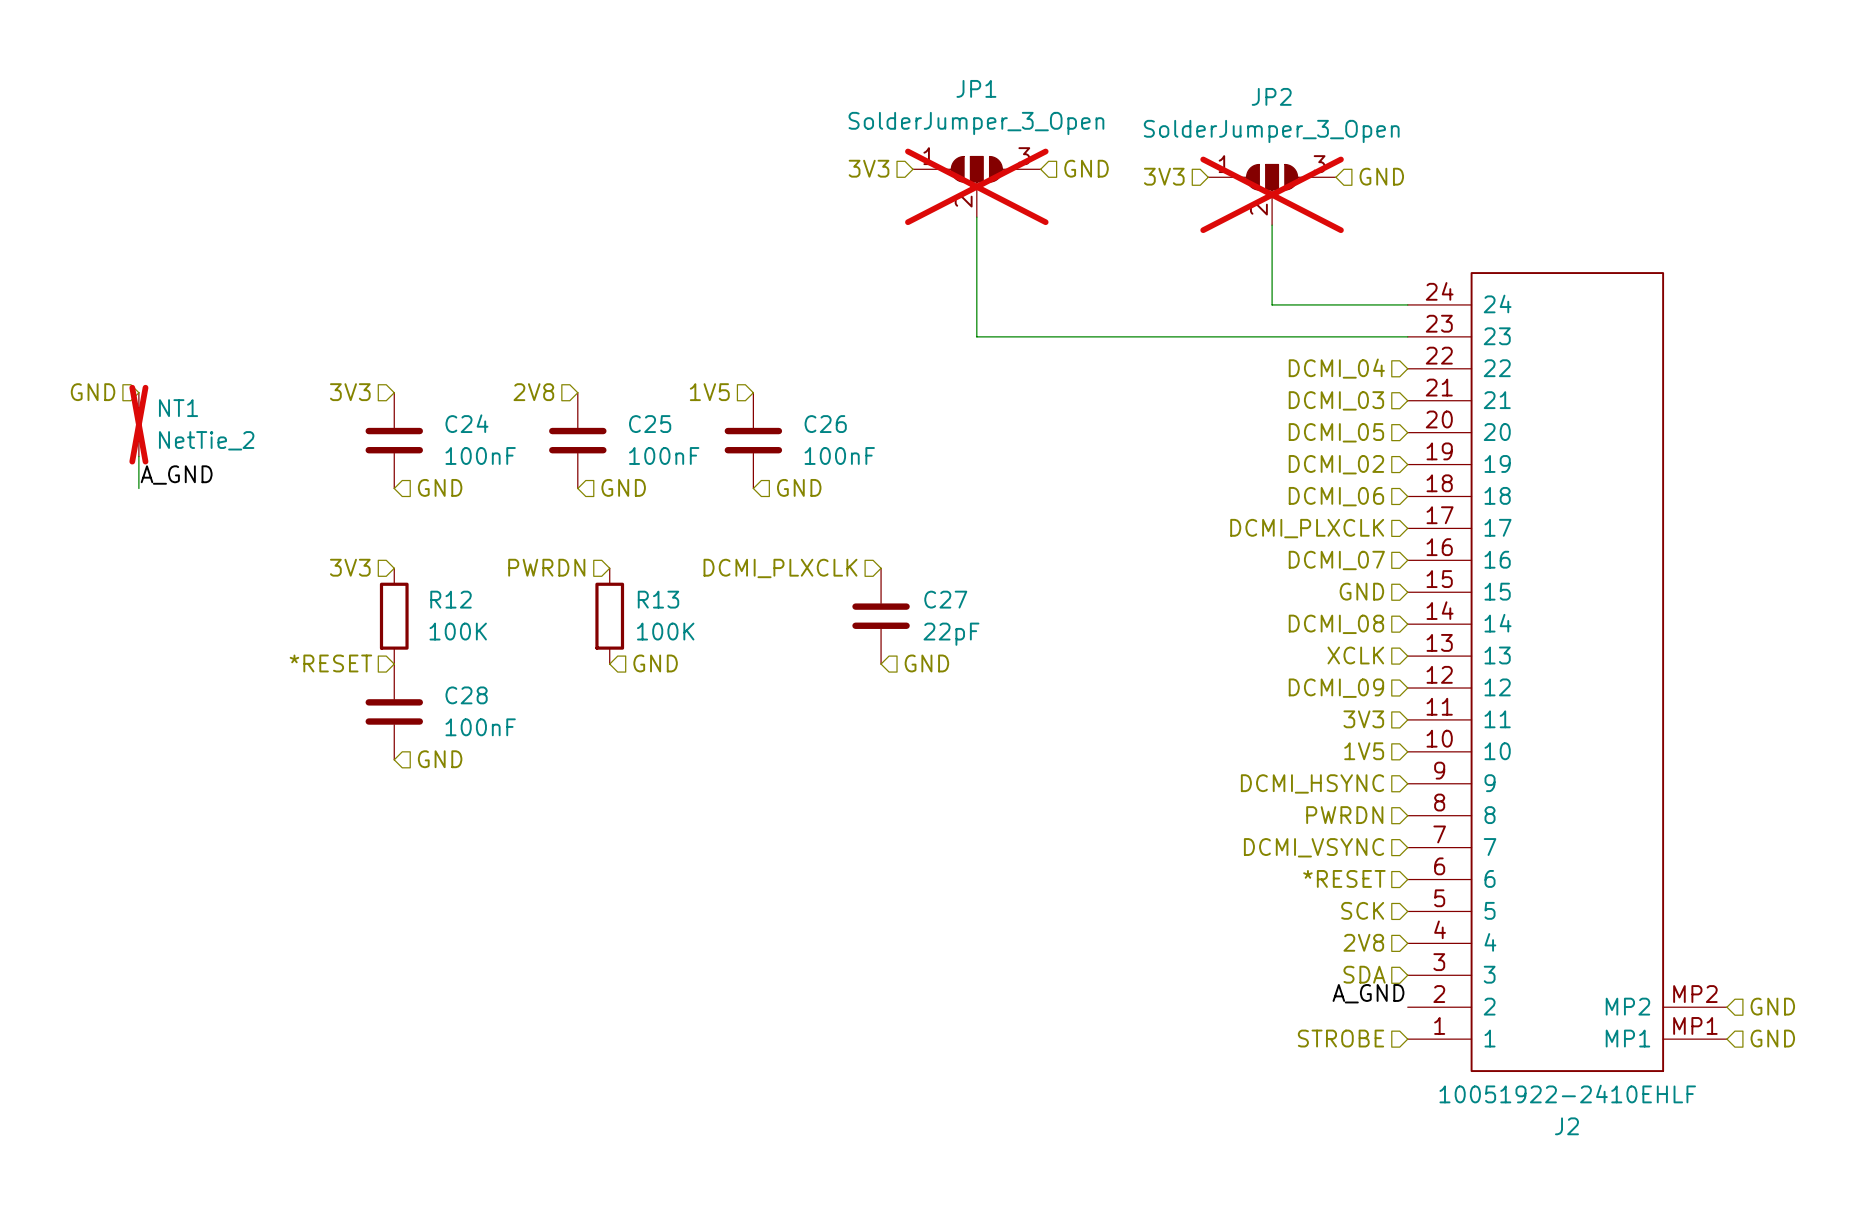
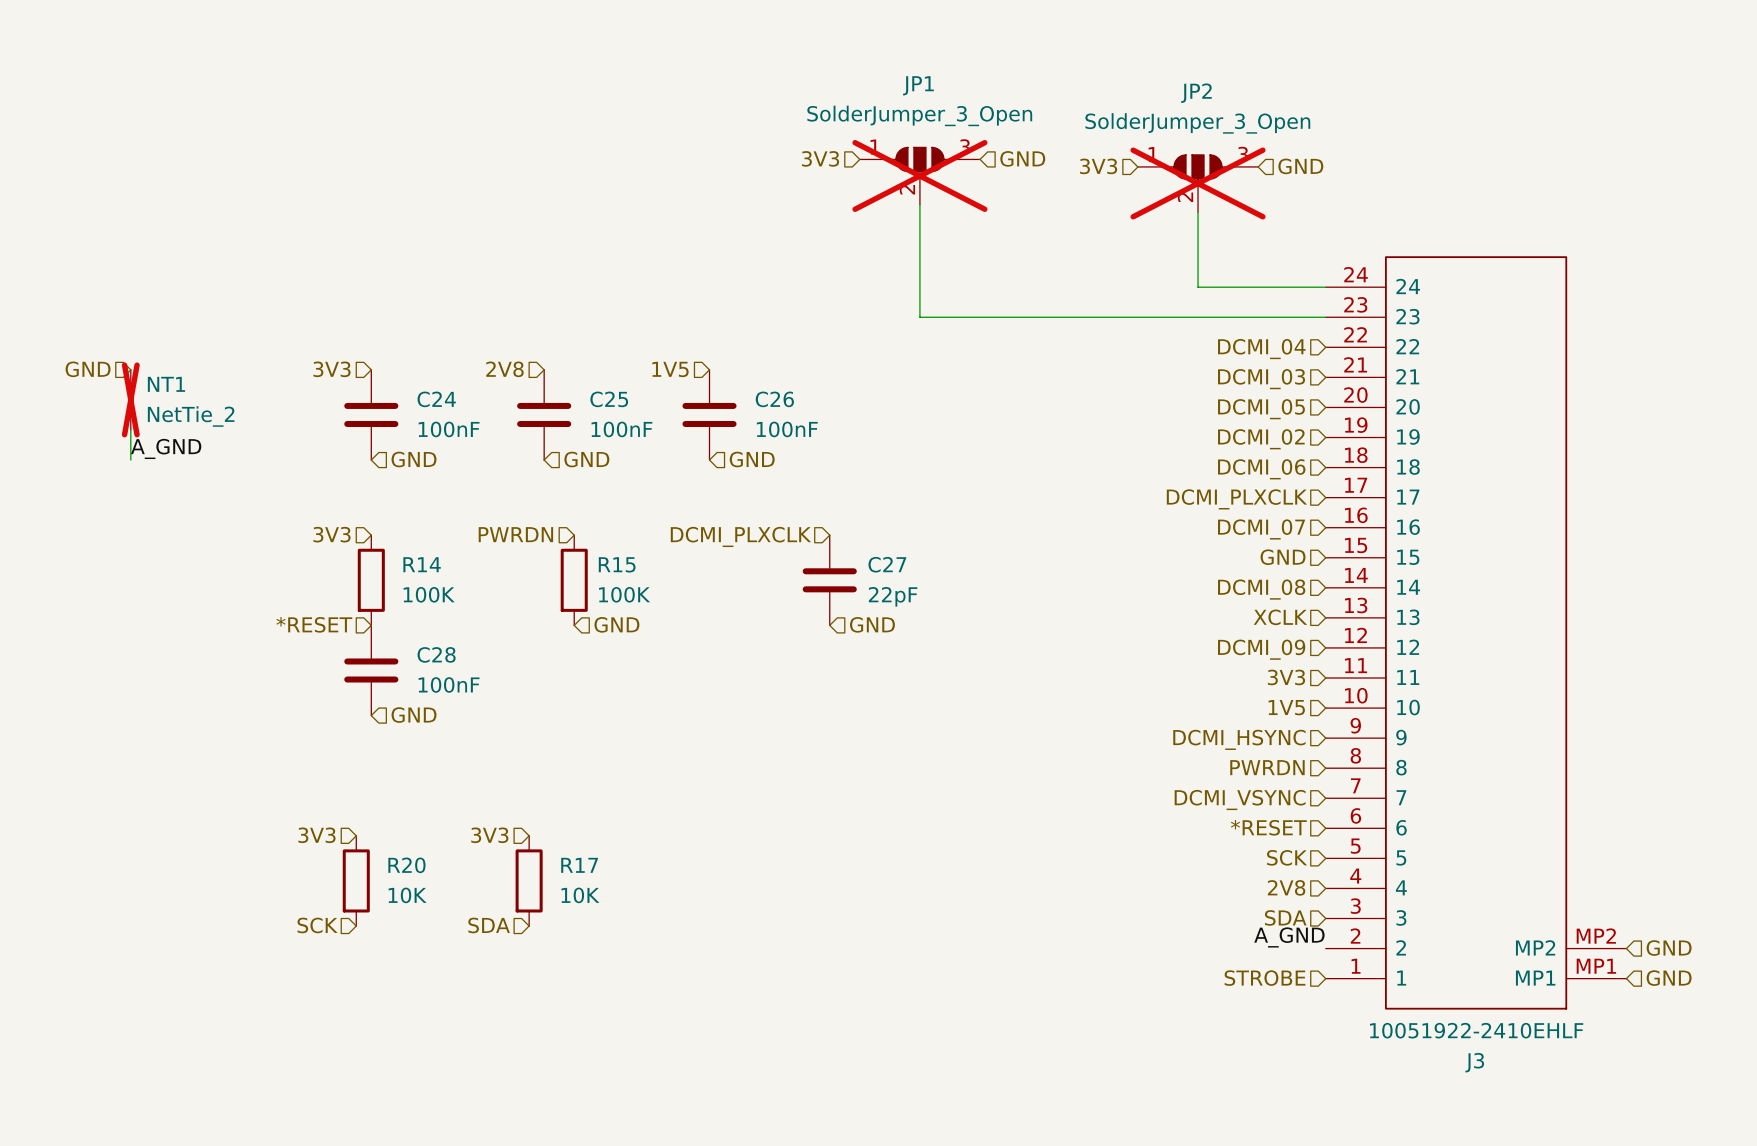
R12 name: R12 (451, 599) -> R14 (422, 564)
R13 name: R13 (658, 599) -> R15 (617, 564)
hierarchical label: none -> 3V3 (316, 835)
hierarchical label: none -> 3V3 (489, 835)
R20: none -> 10K (356, 880)
R17: none -> 10K (529, 880)
hierarchical label: none -> SCK (317, 925)
hierarchical label: none -> SDA (489, 925)
J2 name: J2 (1566, 1126) -> J3 (1474, 1062)

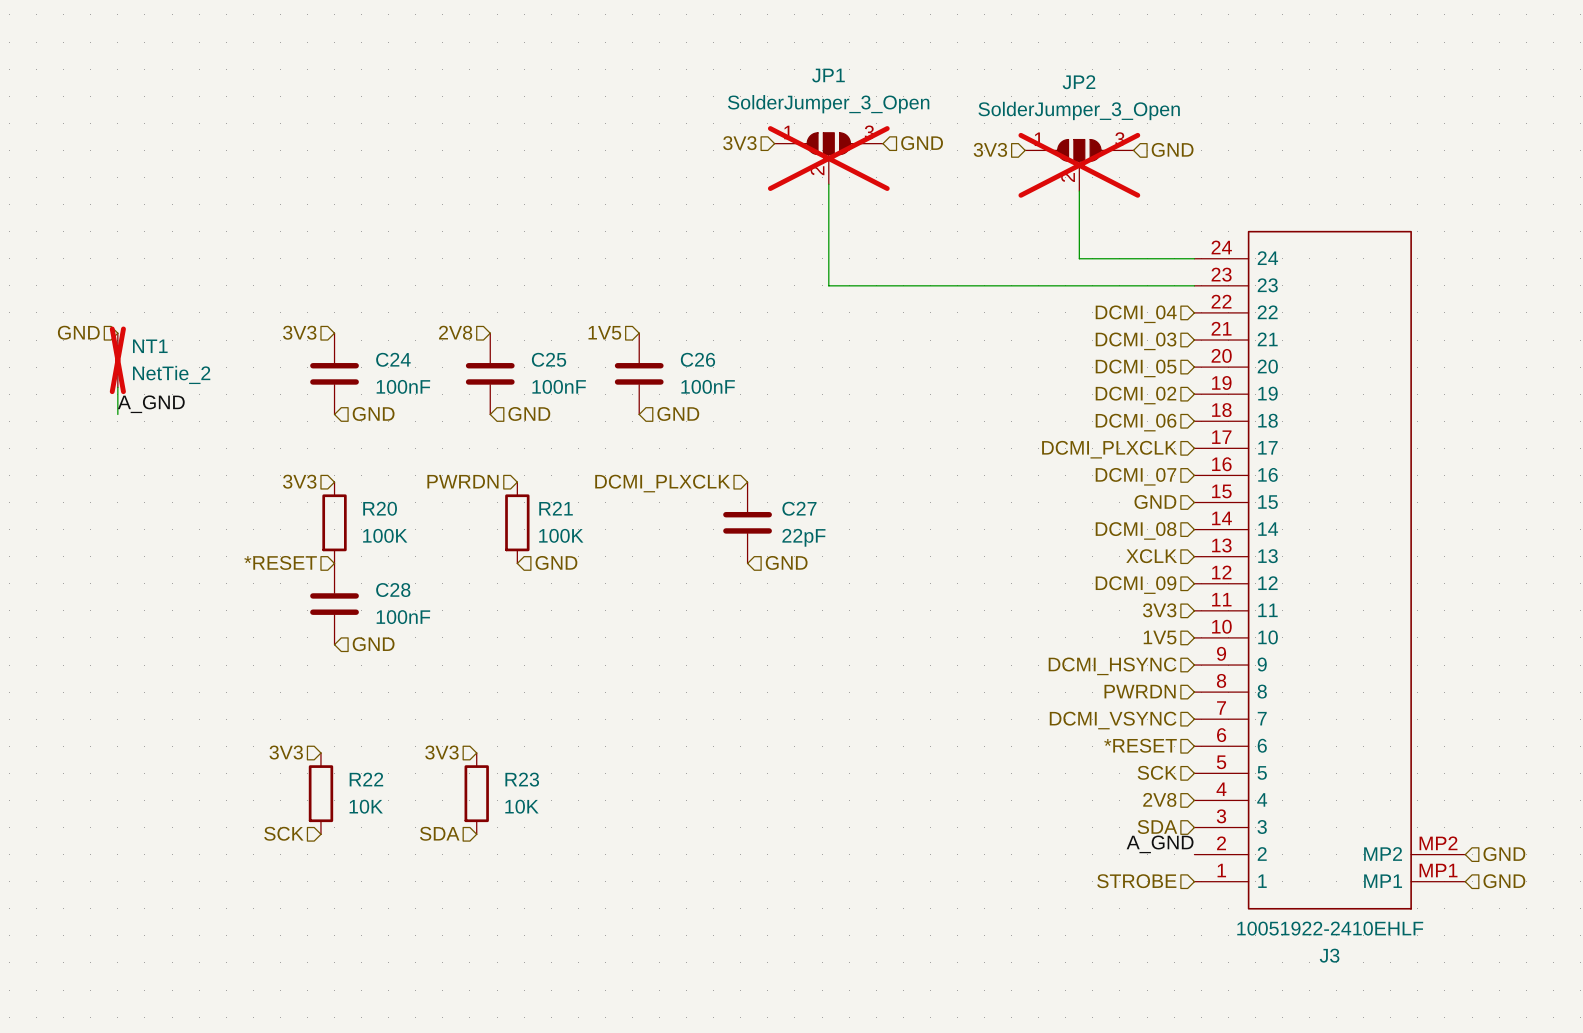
R14 name: R14 (422, 564) -> R20 (380, 508)
R15 name: R15 (617, 564) -> R21 (556, 508)
R20 name: R20 (406, 865) -> R22 (366, 779)
R17 name: R17 (579, 865) -> R23 (522, 779)

